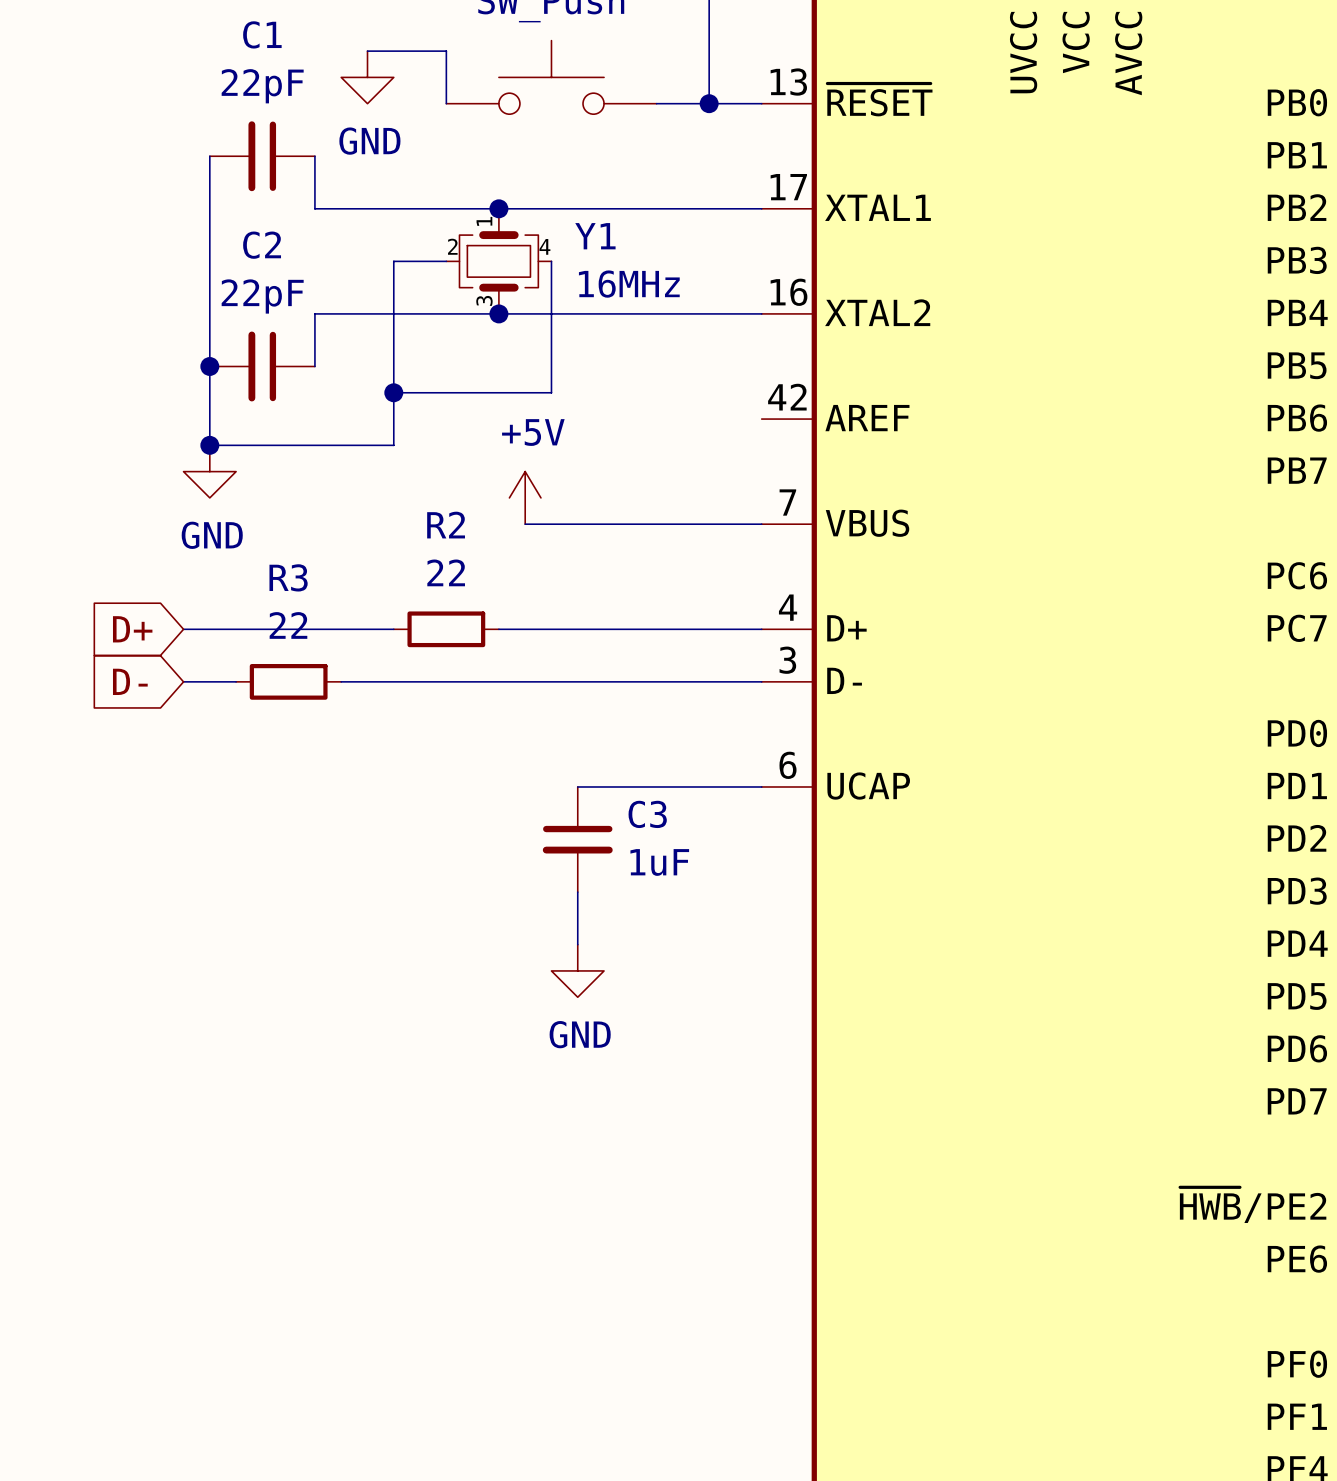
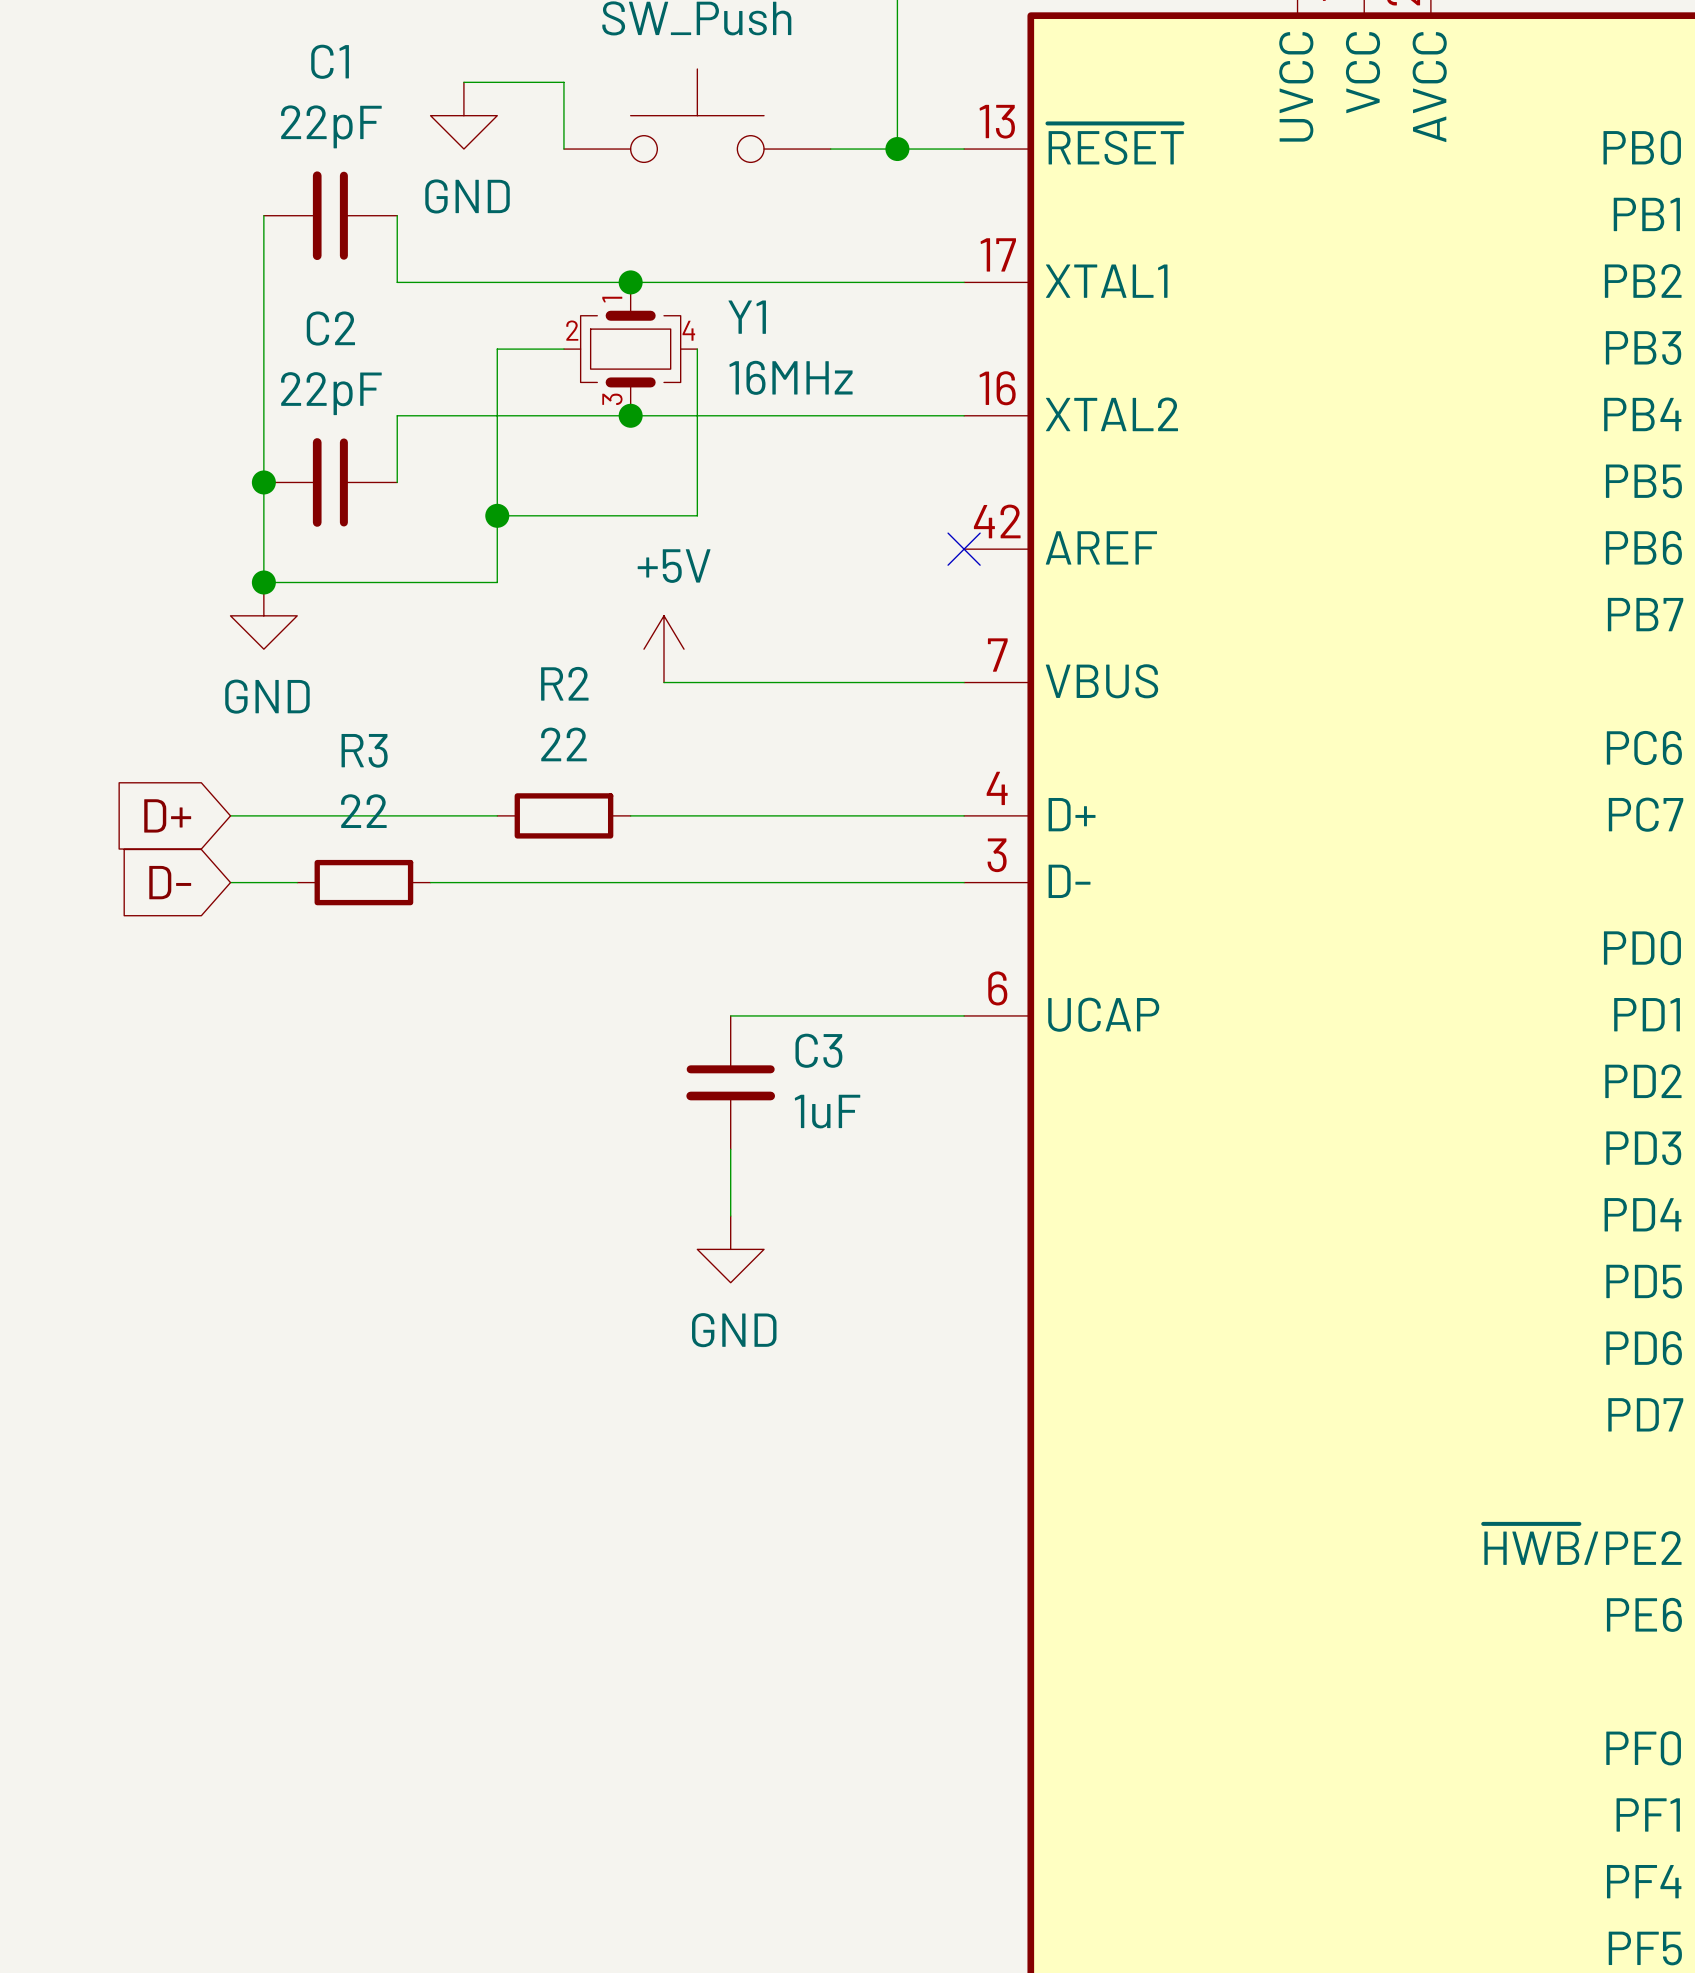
no-connect mark: none -> (964, 549)

